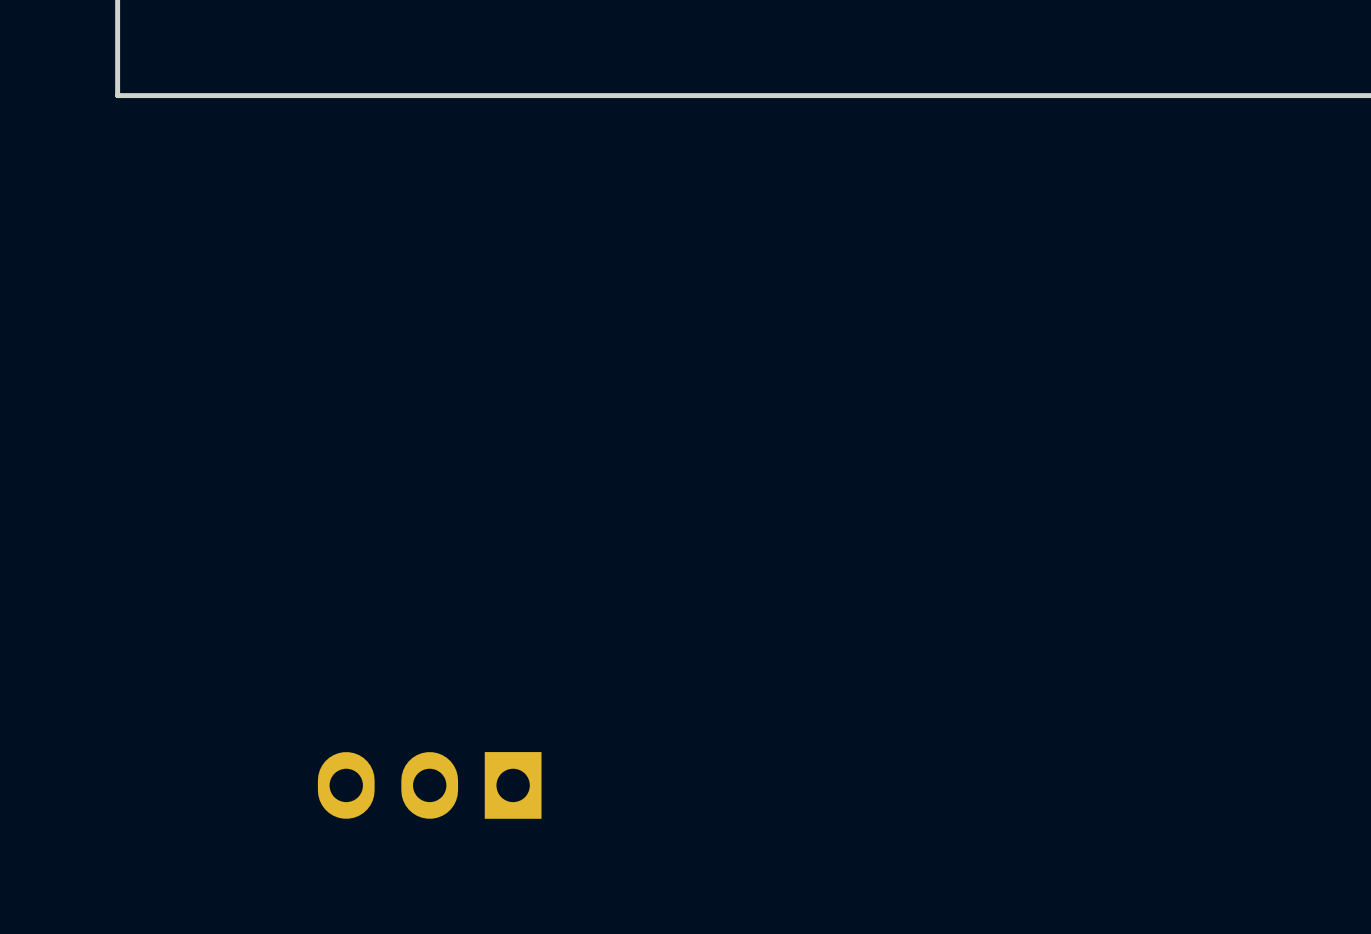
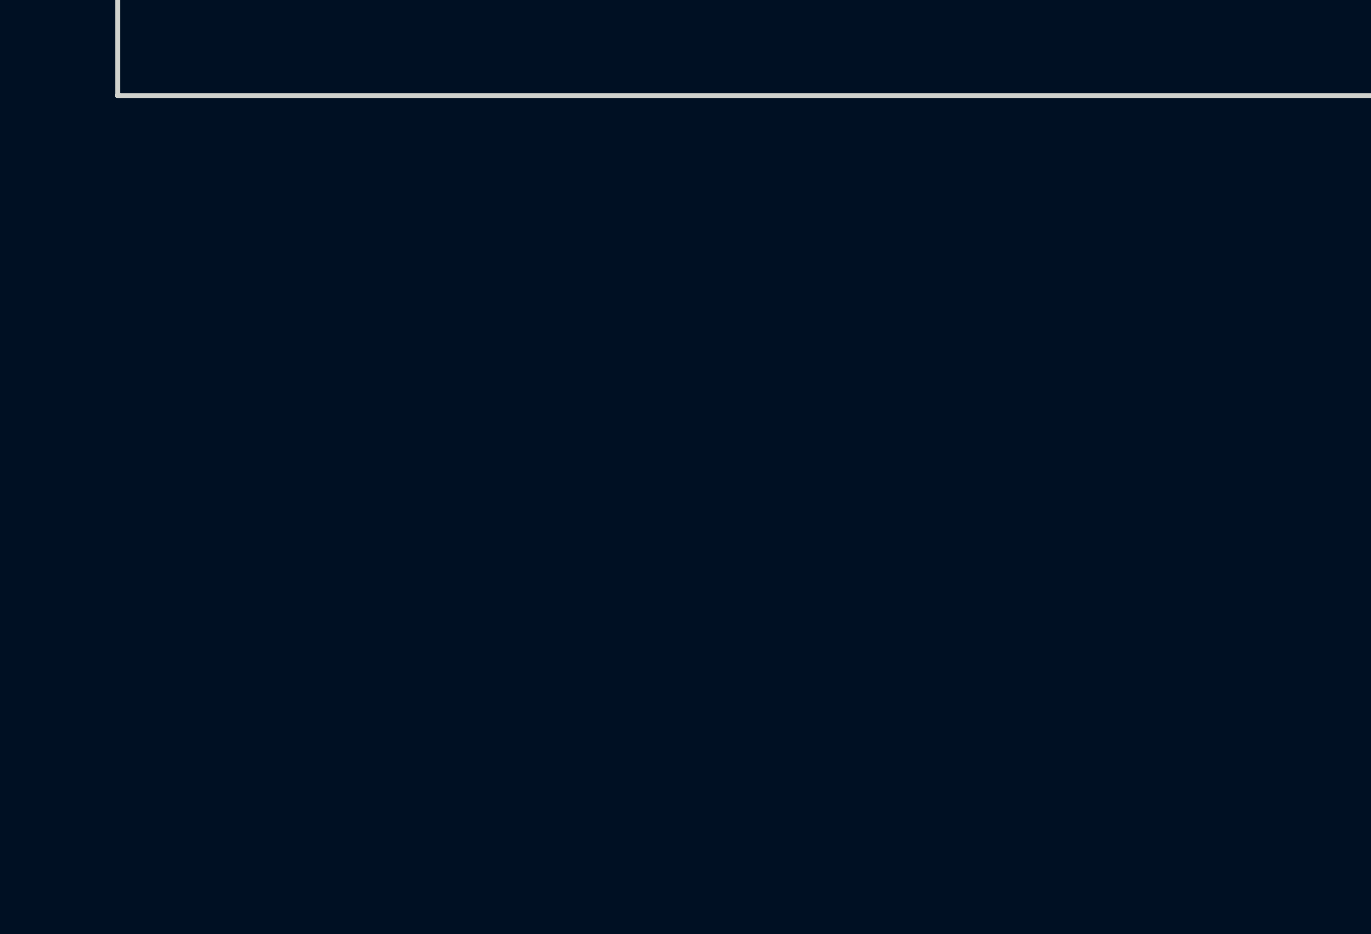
part: (429, 785) -> none

